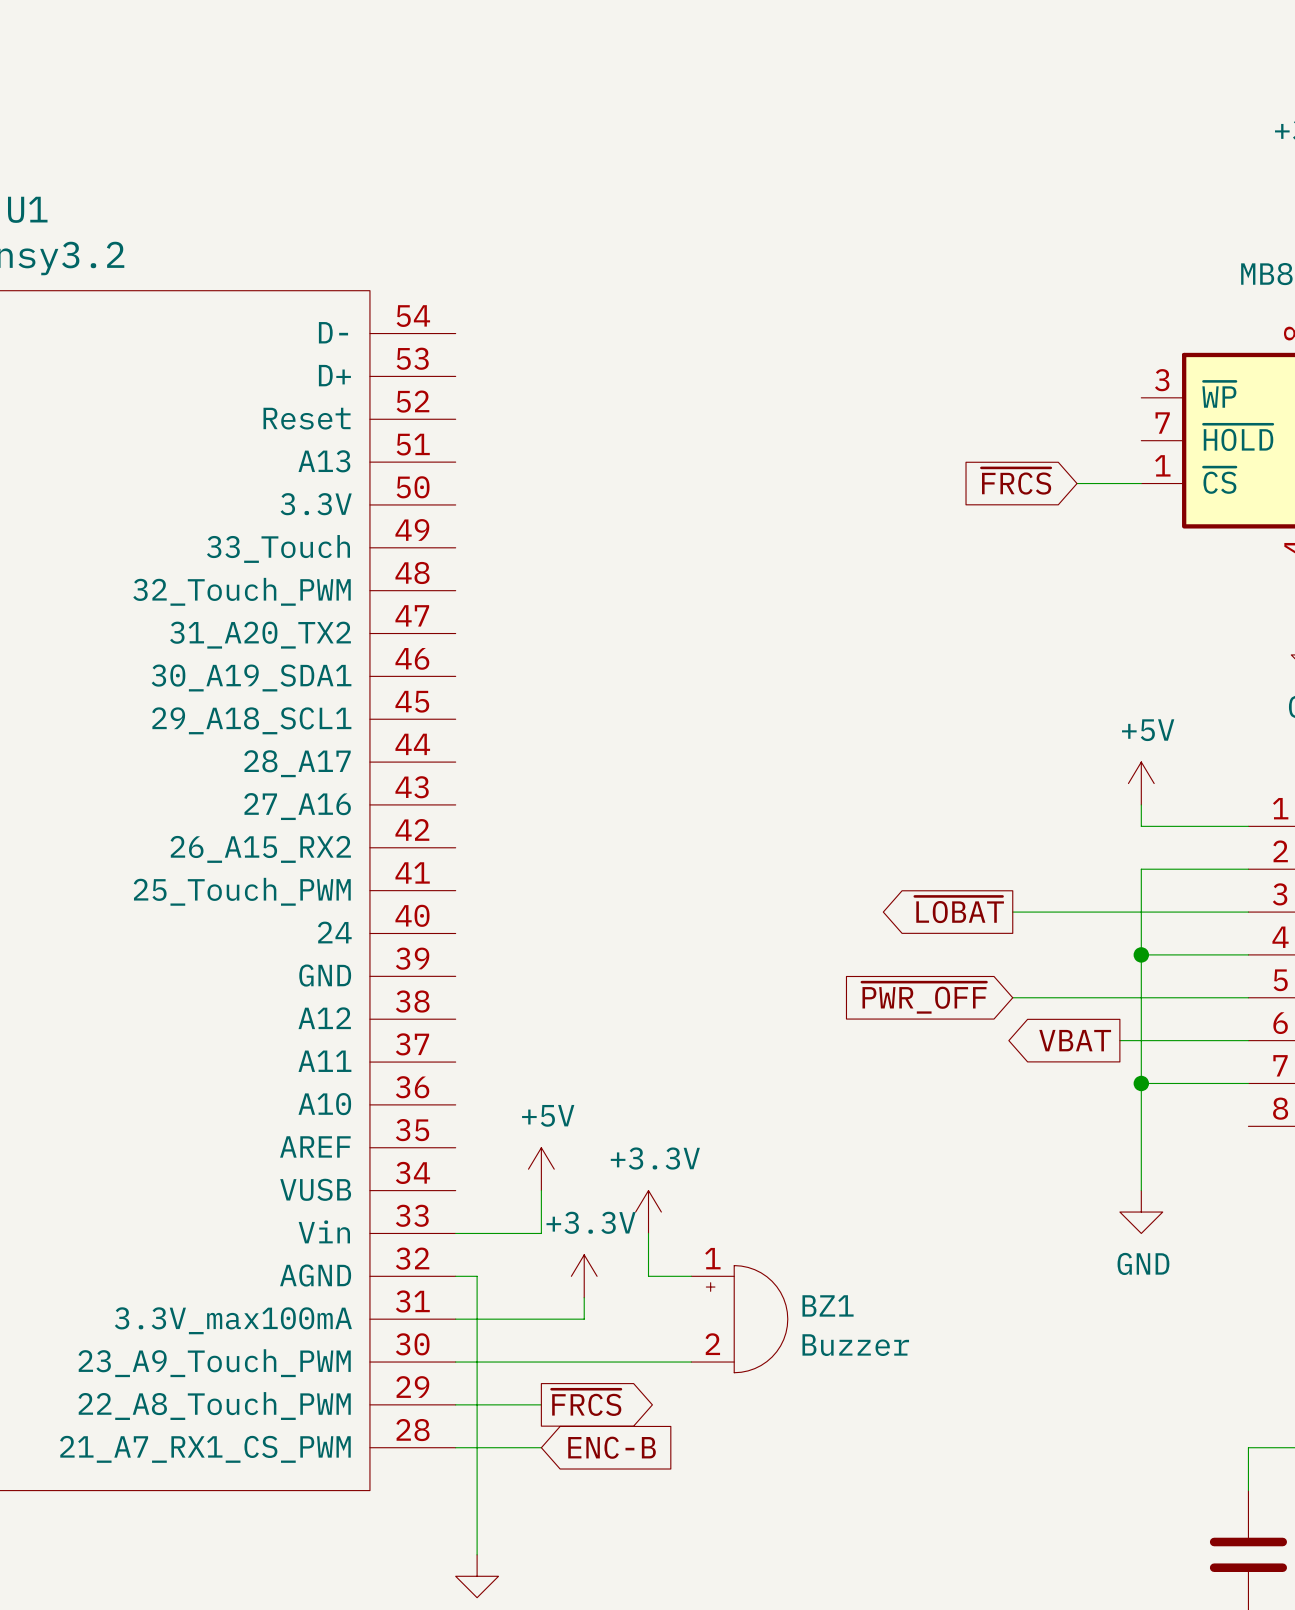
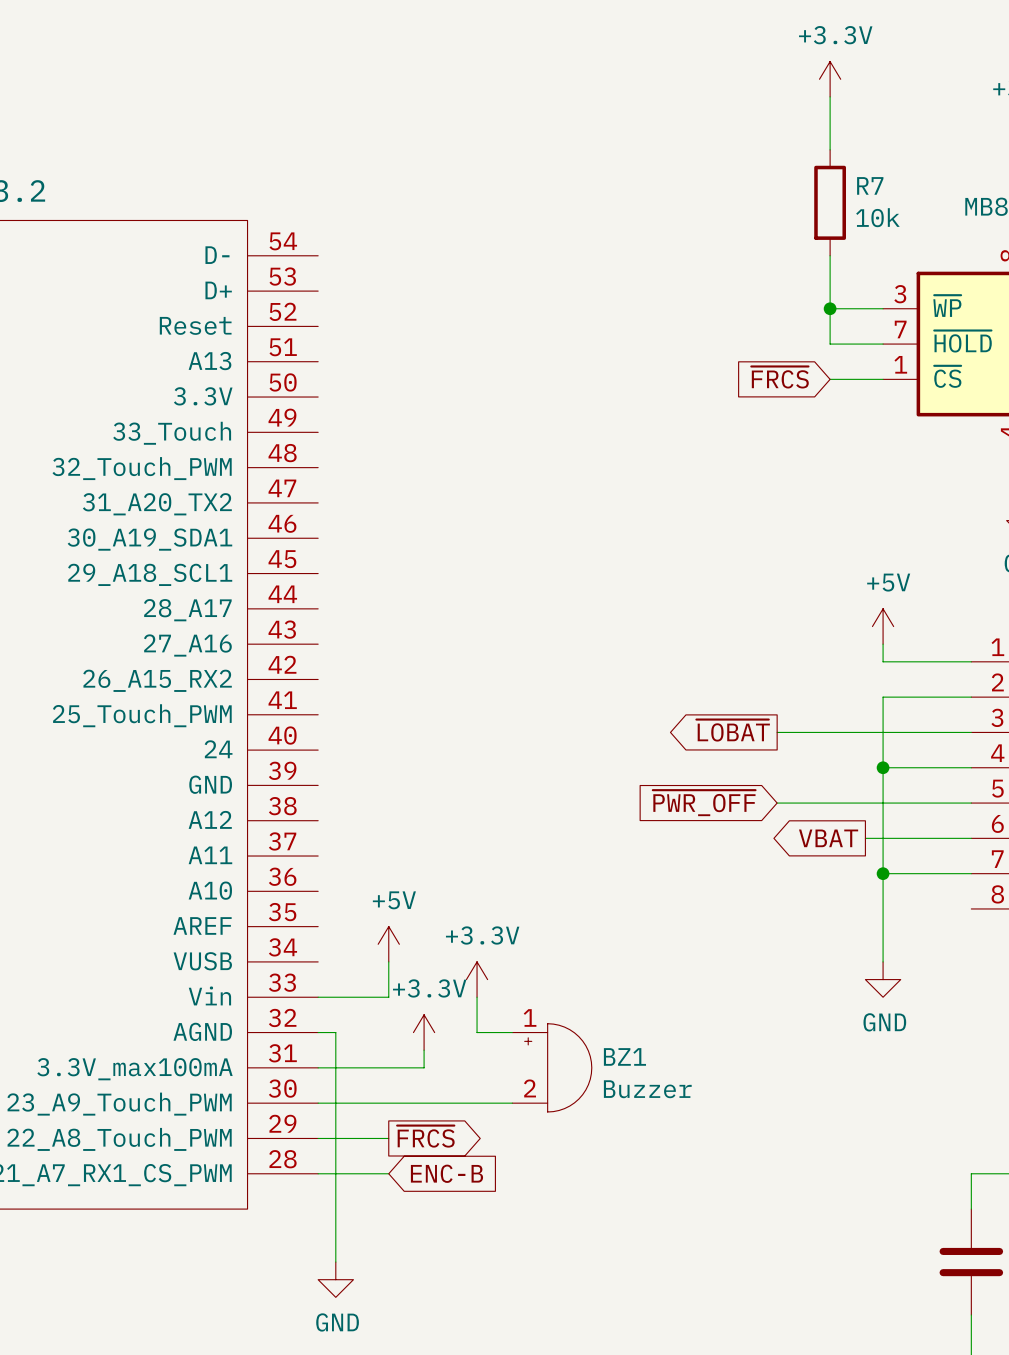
power symbol: none -> +3.3V (830, 79)
wire: none -> (830, 96) (830, 149)
R7: none -> 10k (830, 202)
wire: none -> (830, 255) (830, 344) (883, 344)
wire: none -> (830, 308) (883, 308)
junction: none -> (830, 308)

